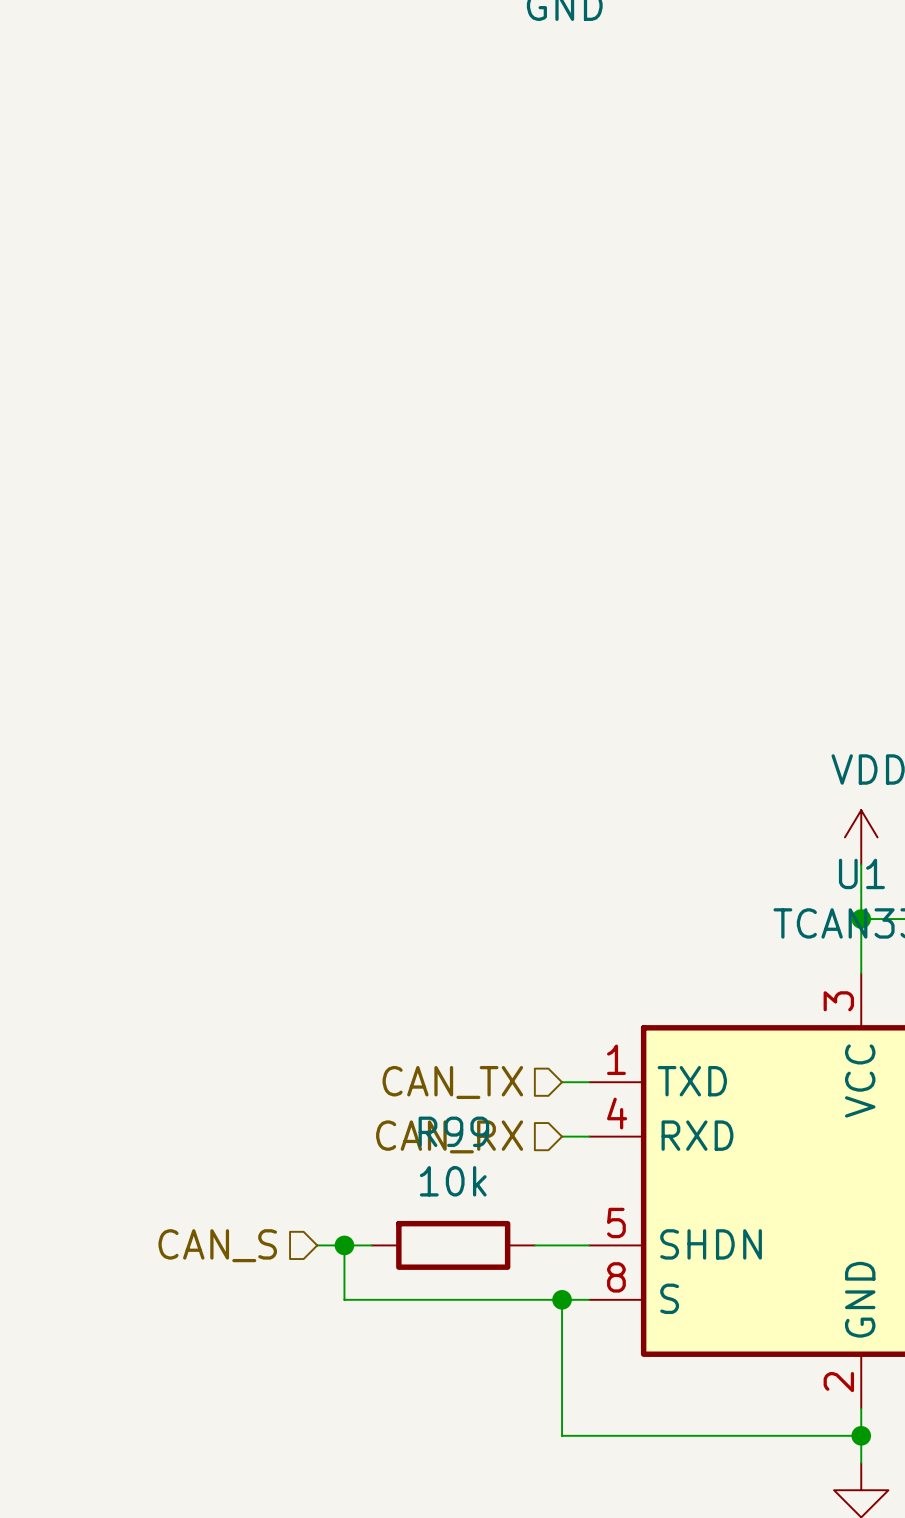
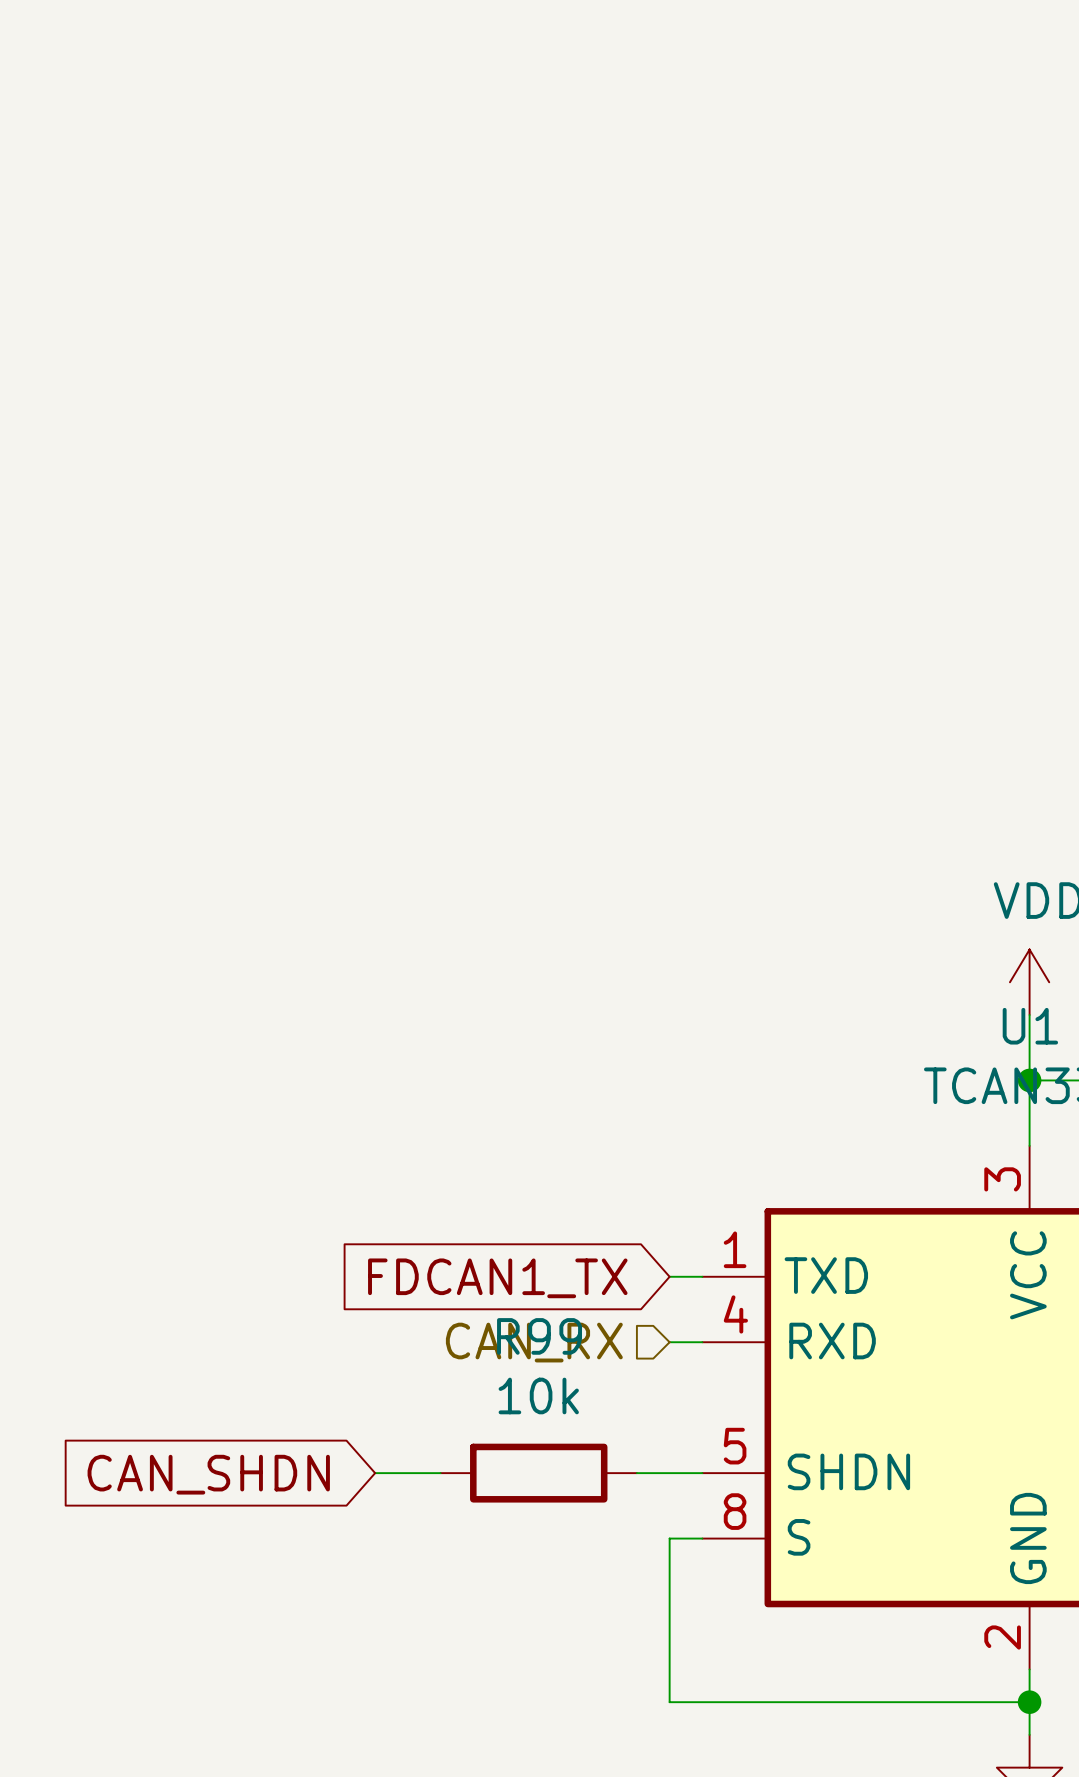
hierarchical label: CAN_TX (452, 1082) -> none
global label: none -> FDCAN1_TX (497, 1278)
hierarchical label: CAN_S (217, 1245) -> none
wire: (344, 1245) (344, 1299) (562, 1299) -> none
junction: (344, 1245) -> none
global label: none -> CAN_SHDN (208, 1474)
junction: (562, 1299) -> none

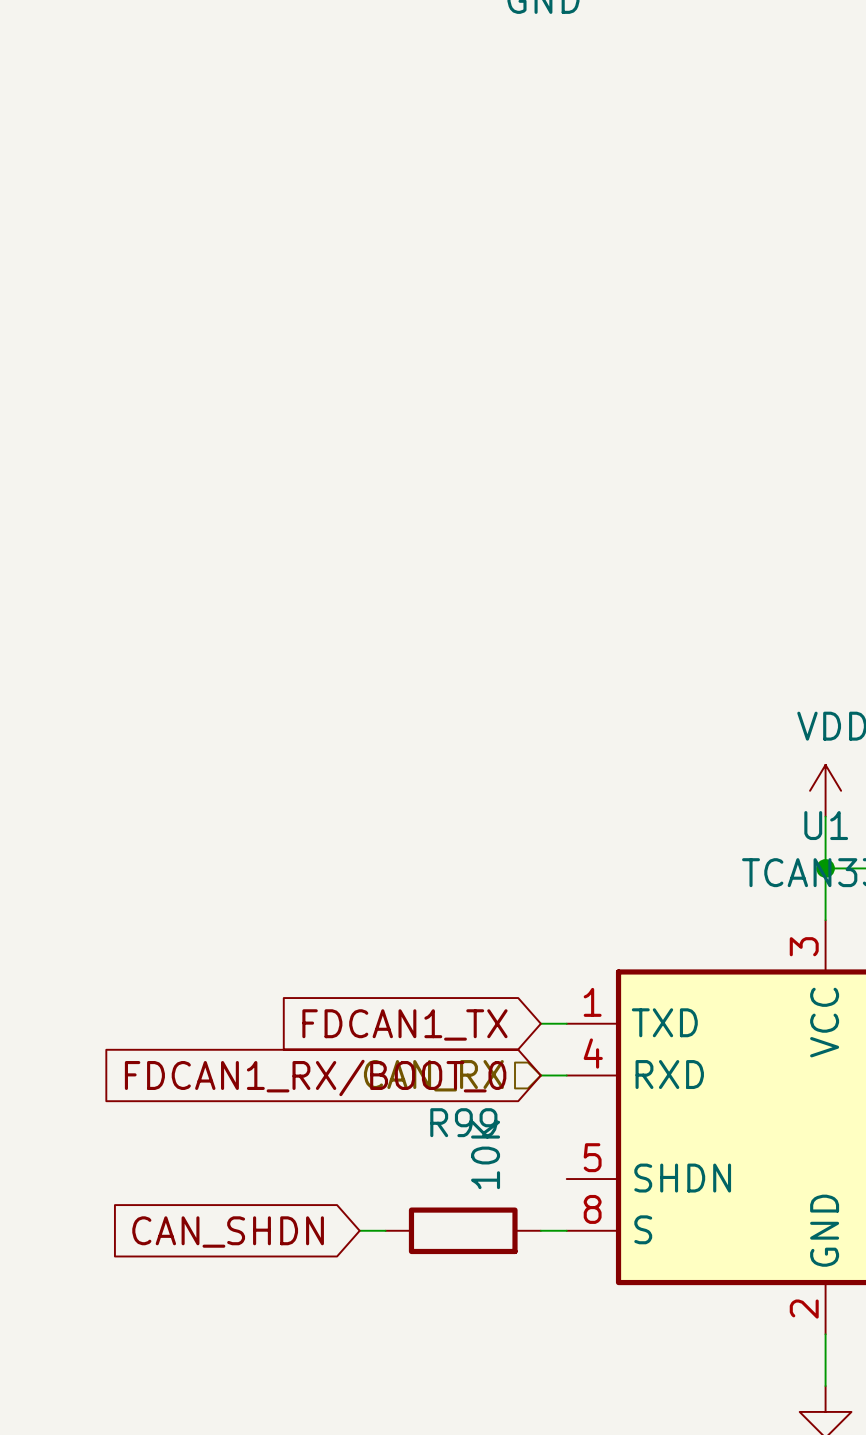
global label: none -> FDCAN1_RX/BOOT_0 (315, 1077)
R99 value: 10k (538, 1395) -> 10K (485, 1154)
wire: (375, 1473) (440, 1473) -> none
R99 position: (538, 1473) -> (463, 1230)
wire: (636, 1473) (702, 1473) -> none
global label position: CAN_SHDN (208, 1474) -> CAN_SHDN (228, 1232)
wire: none -> (359, 1230) (385, 1230)
wire: (669, 1538) (669, 1702) (1029, 1702) -> none
junction: (1029, 1702) -> none

